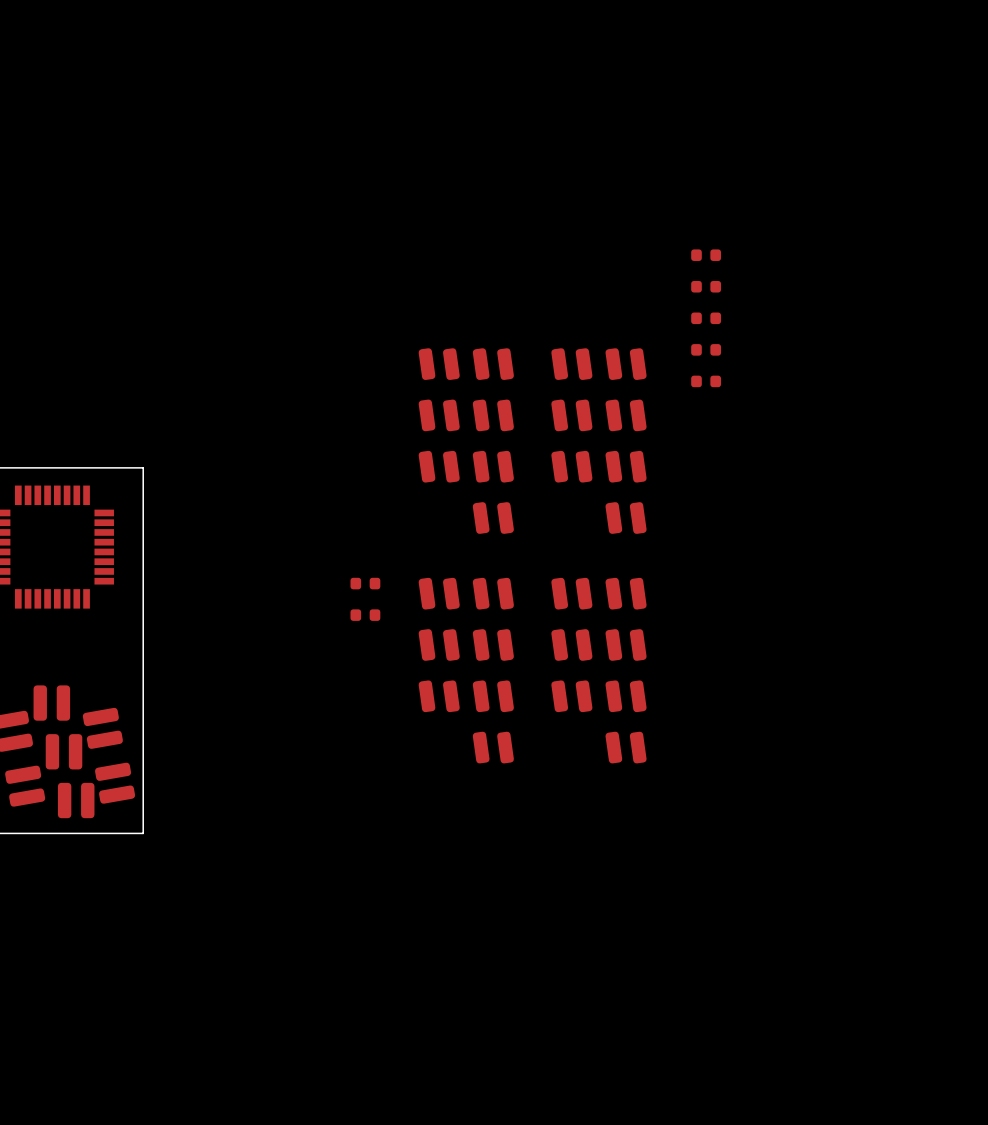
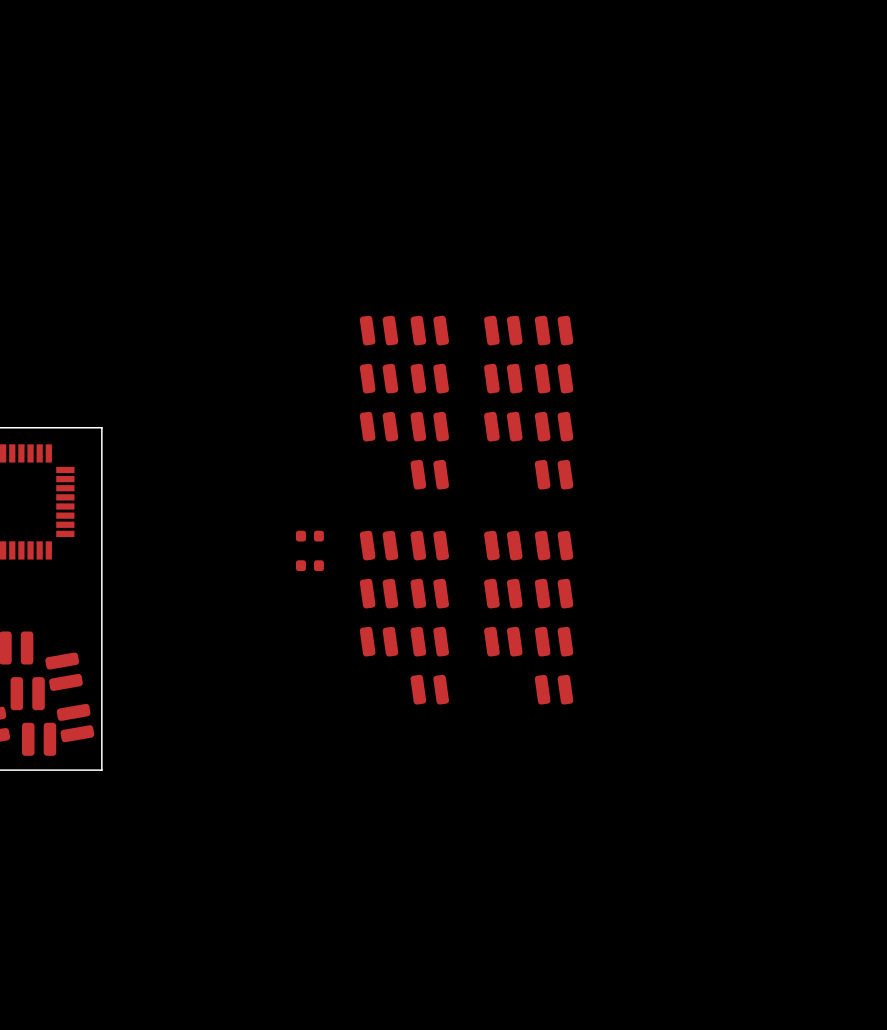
part: (706, 255) -> none
part: (706, 286) -> none
part: (706, 318) -> none
part: (706, 349) -> none
part: (706, 381) -> none

